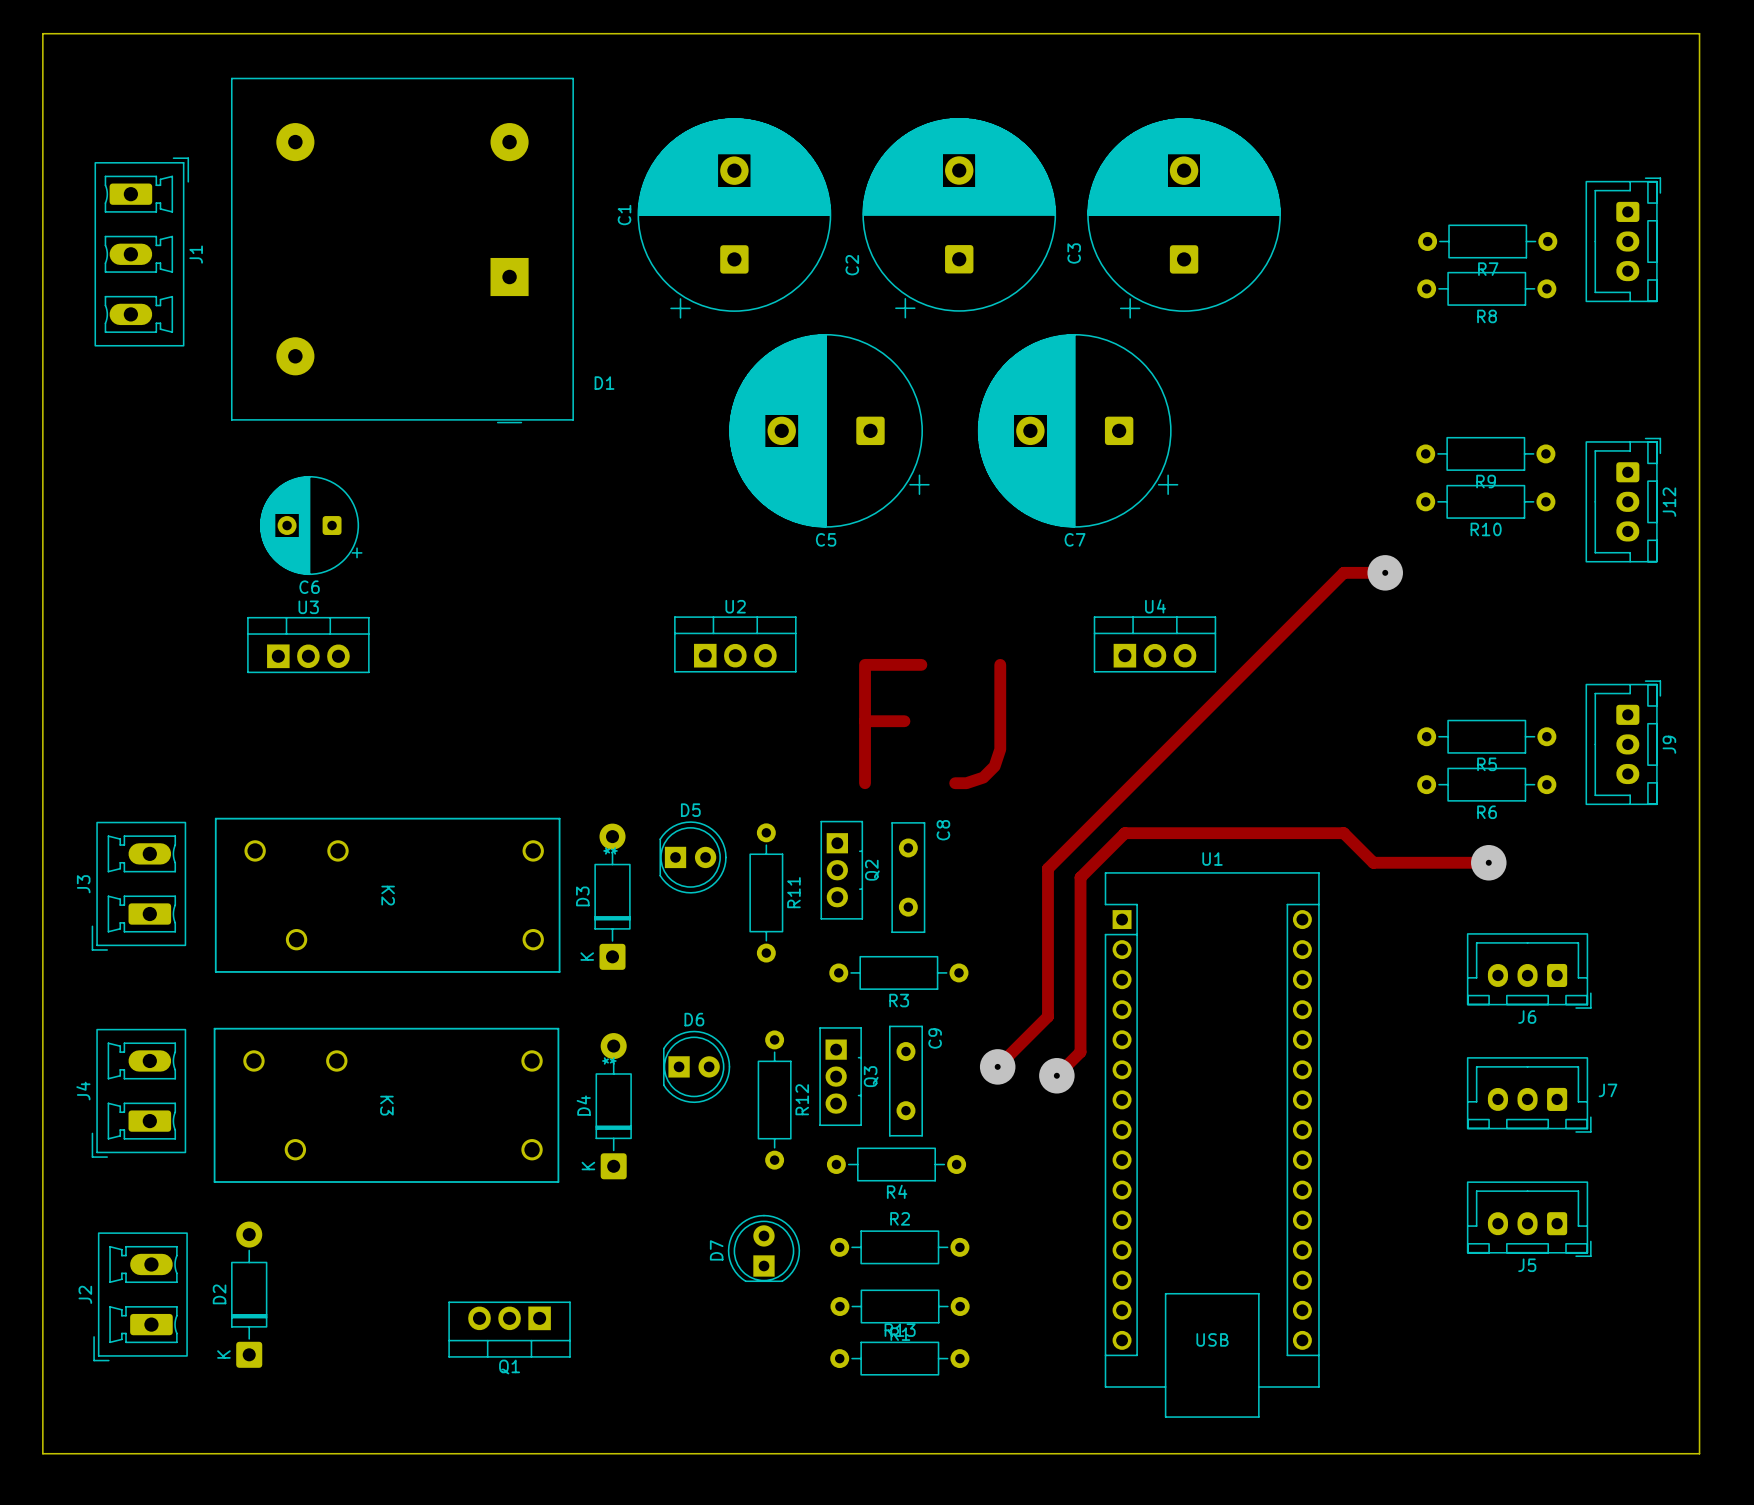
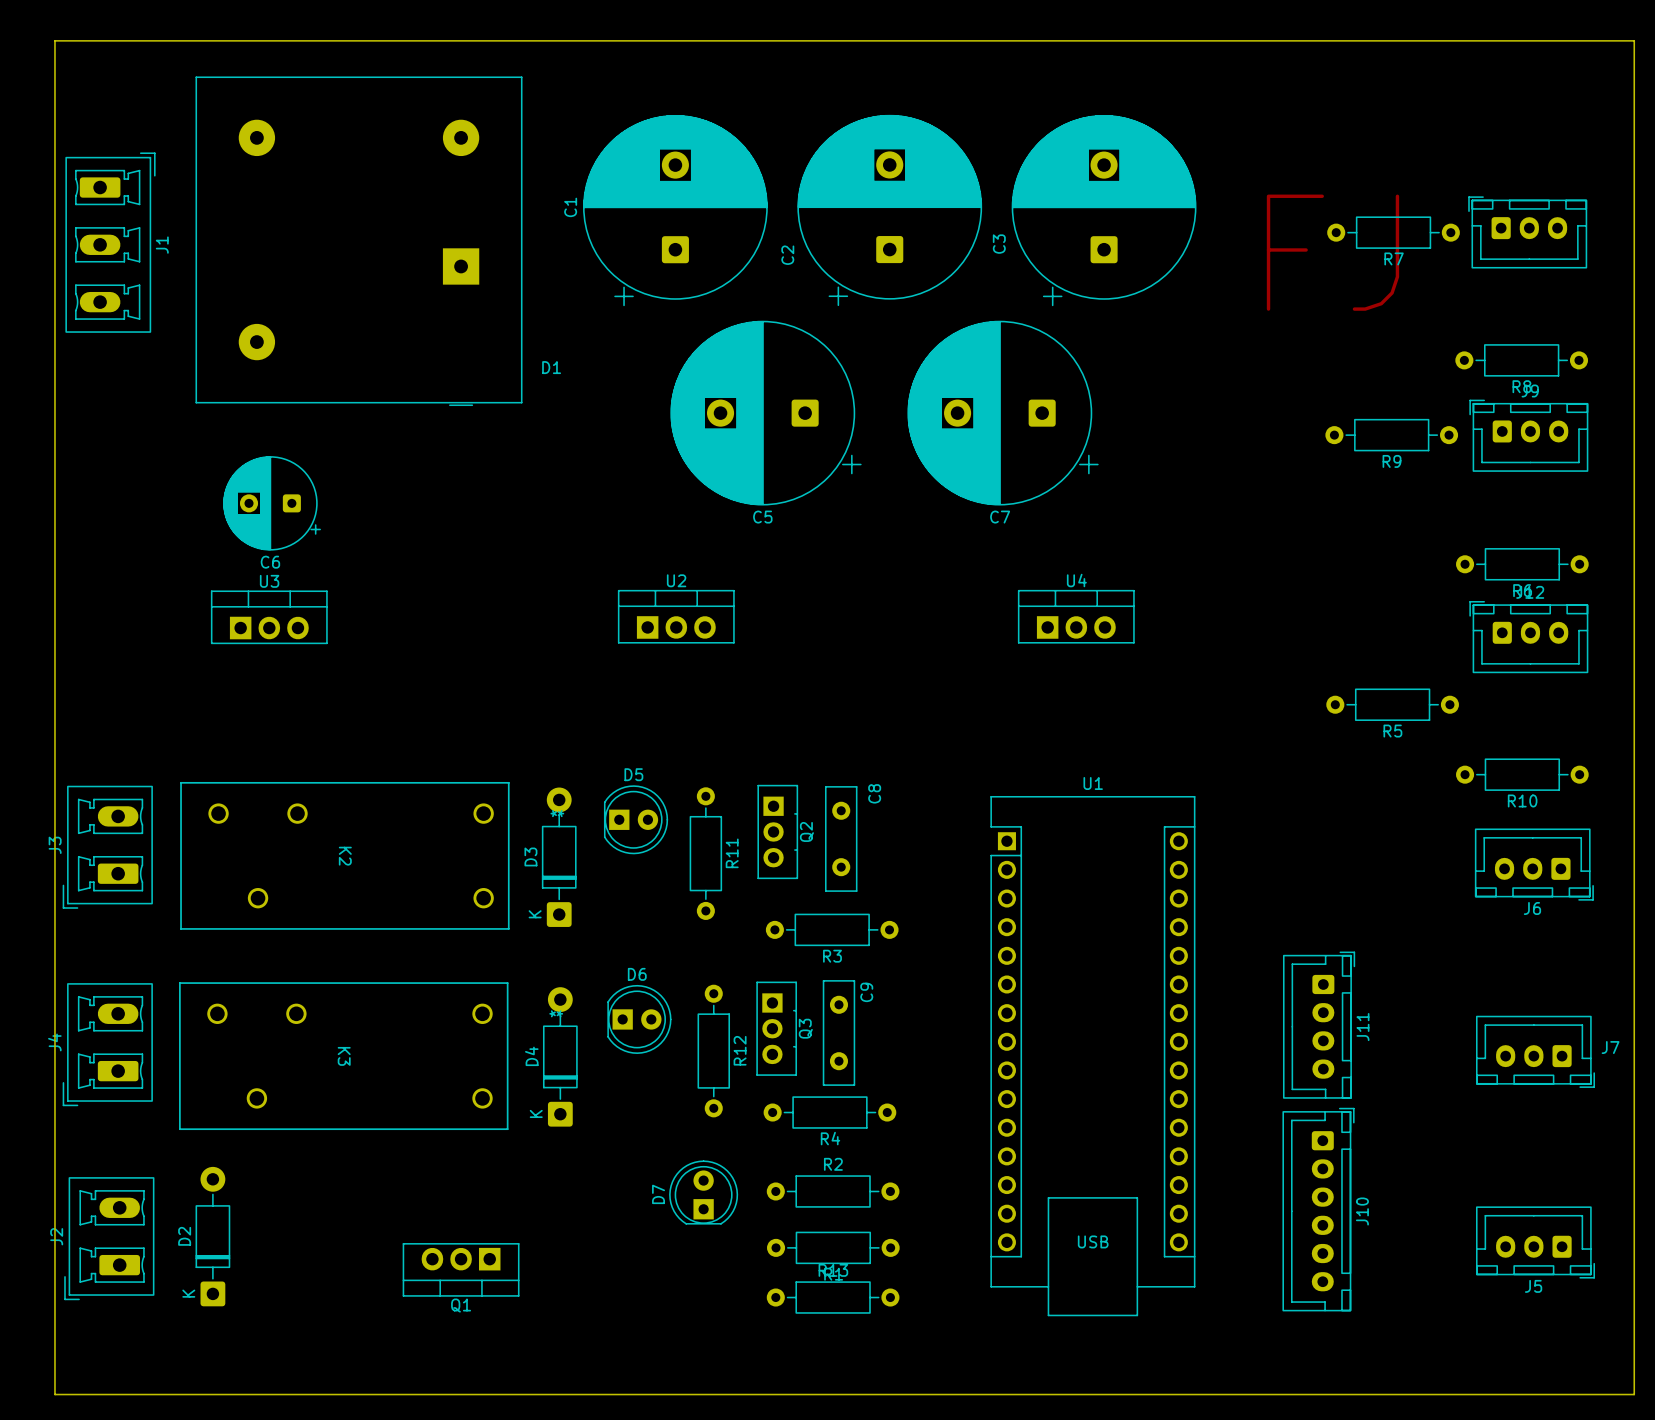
board edge: (42, 33) (1699, 33) (1699, 1453) (42, 1453) (42, 33) -> (54, 40) (1634, 40) (1634, 1394) (54, 1394) (54, 40)
part rotation: 0° (1623, 239) -> 90° counterclockwise (1527, 232)
text: none -> FJ (1332, 252)
R8 position: (1486, 288) -> (1521, 360)
J12 rotation: 0° (1623, 500) -> 90° counterclockwise (1528, 637)
J12 position: (1623, 500) -> (1528, 637)
R10 position: (1485, 501) -> (1522, 774)
track: (1385, 572) (1343, 572) (1047, 868) (1047, 1016) (997, 1066) -> none
via: (1385, 572) -> none
text: FJ (932, 724) -> none
J9 rotation: 0° (1623, 742) -> 90° counterclockwise (1528, 435)
J9 position: (1623, 742) -> (1528, 435)
R6 position: (1486, 784) -> (1522, 564)
track: (1488, 862) (1373, 862) (1343, 833) (1124, 833) (1080, 877) (1080, 1052) (1056, 1075) -> none
via: (1488, 862) -> none
J6 position: (1529, 970) -> (1534, 864)
via: (997, 1066) -> none
J11: none -> (1319, 1025)
via: (1056, 1075) -> none
J7 position: (1529, 1094) -> (1535, 1051)
U1 position: (1212, 1144) -> (1092, 1056)
J5 position: (1529, 1219) -> (1535, 1242)
J10: none -> (1318, 1209)

